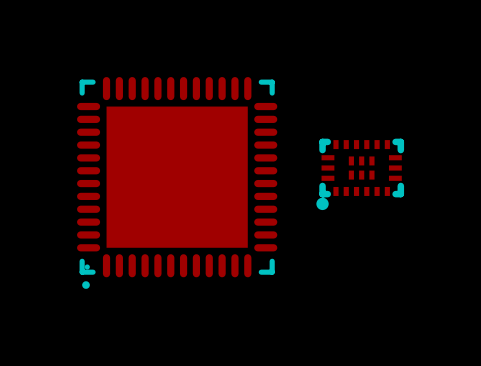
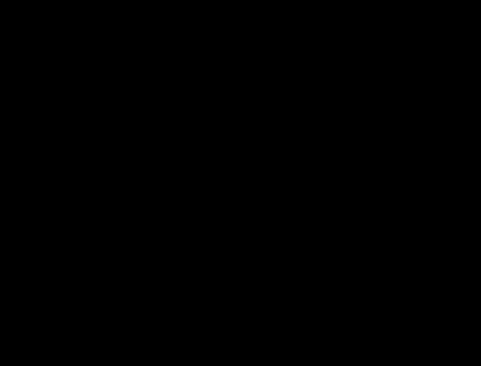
part: (360, 174) -> none
part: (177, 182) -> none

